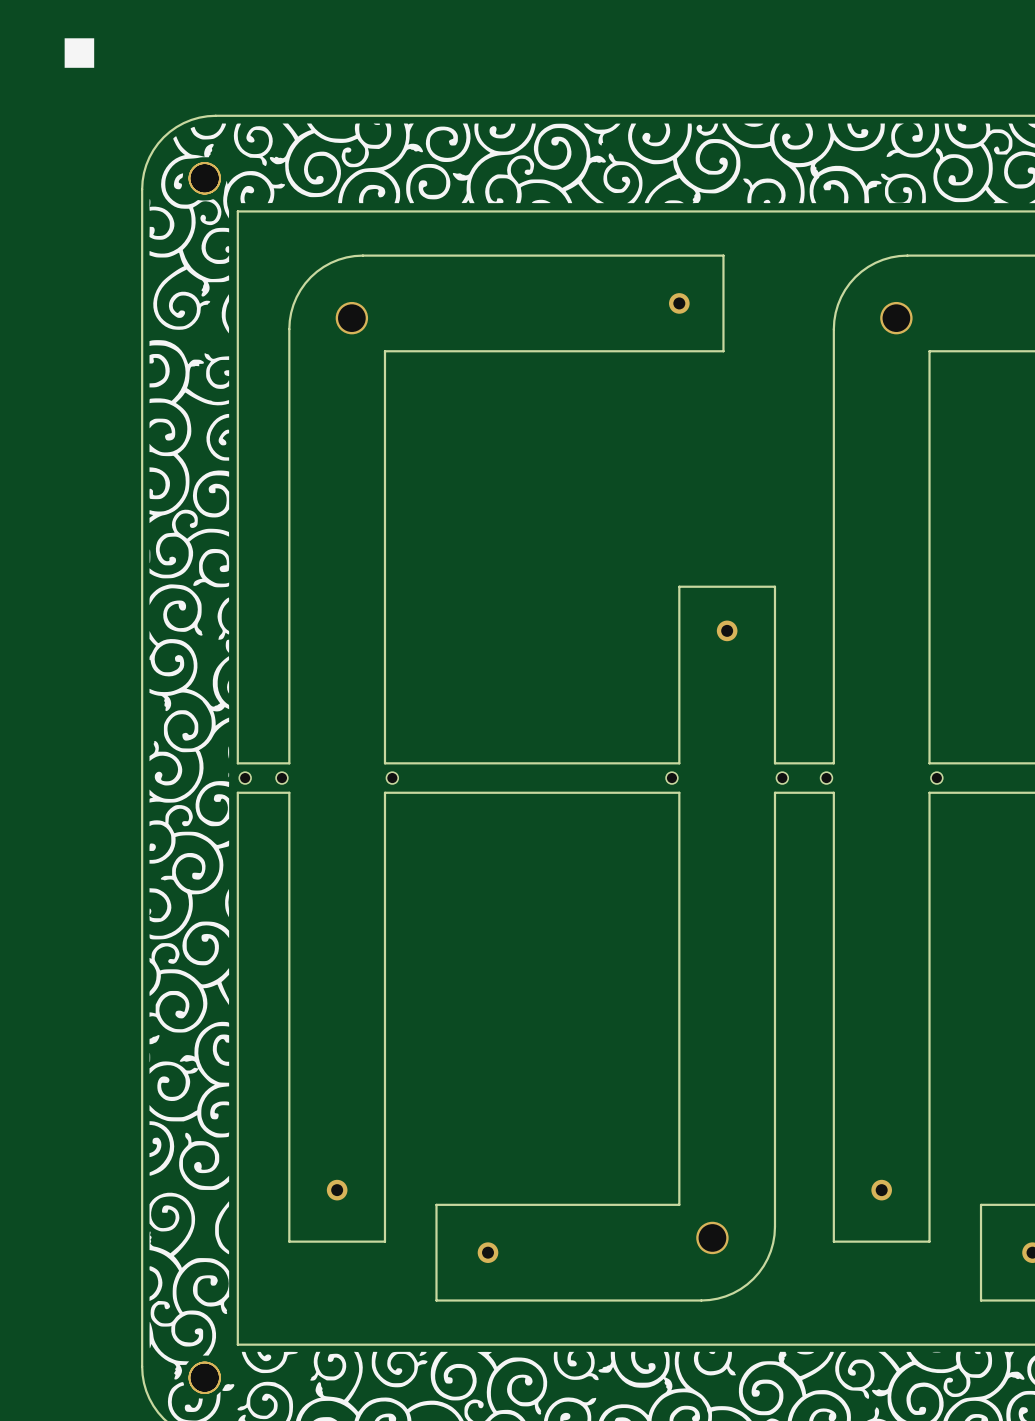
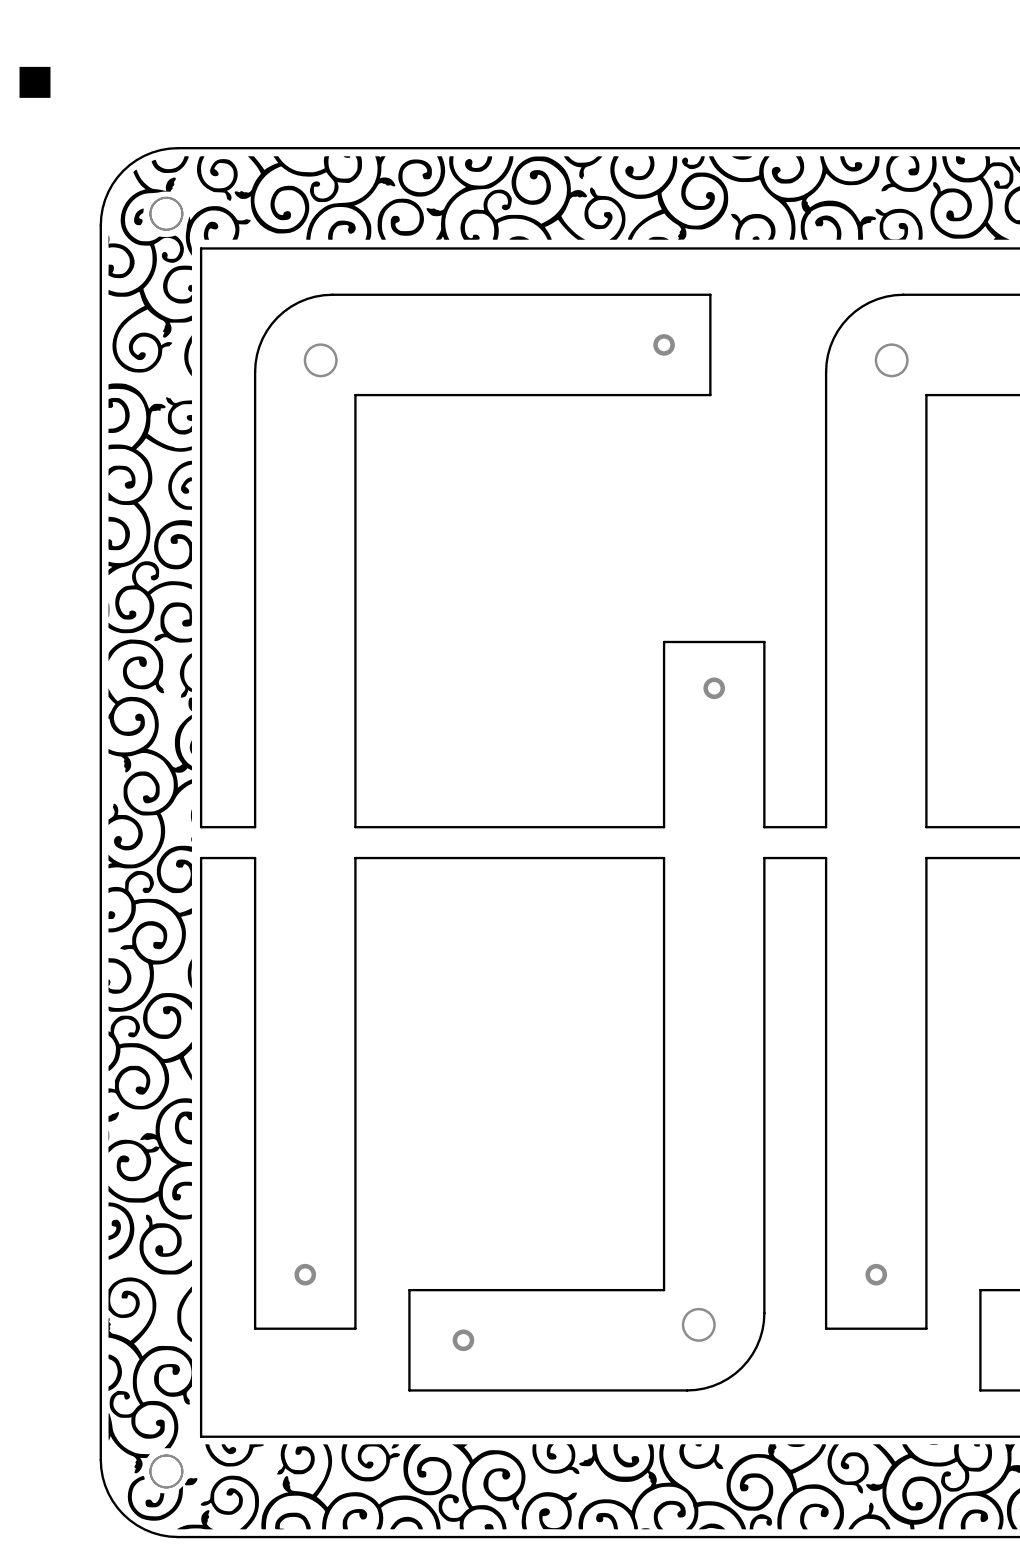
part: (245, 778) -> none
part: (281, 778) -> none
part: (392, 778) -> none
part: (671, 778) -> none
part: (782, 778) -> none
part: (826, 778) -> none
part: (936, 778) -> none

